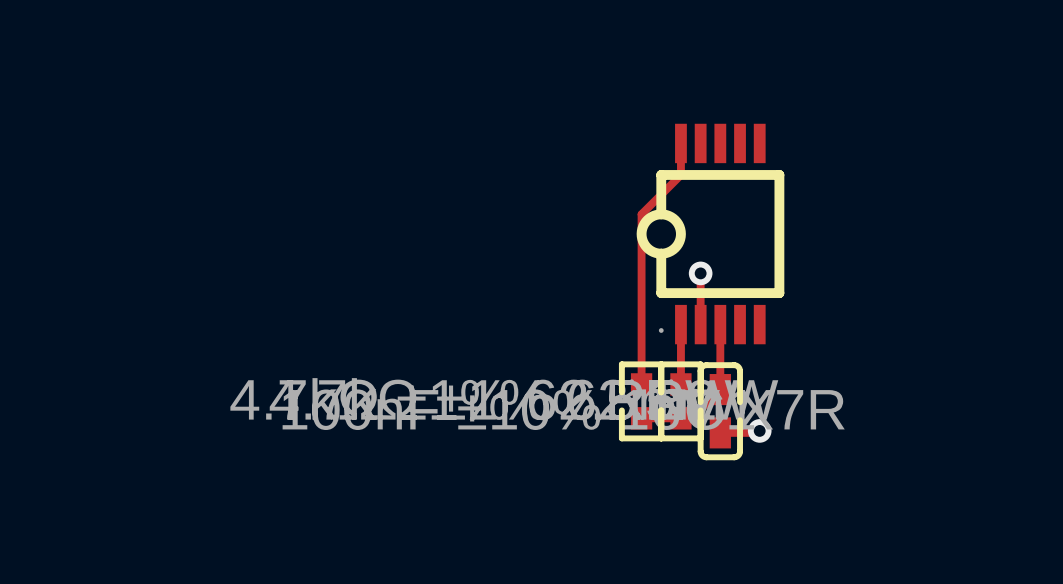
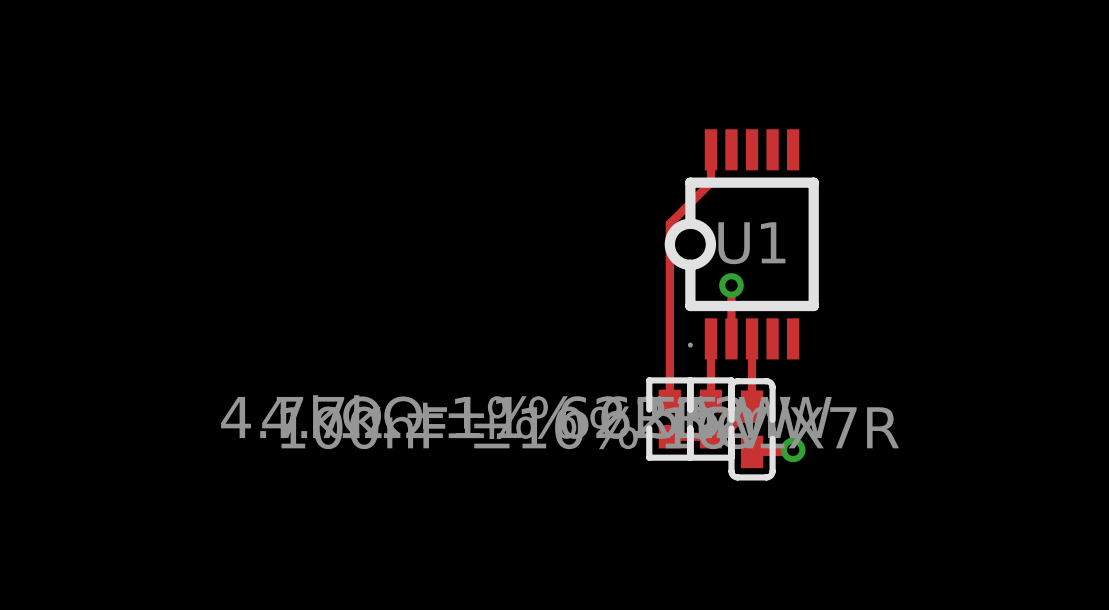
U1 name: none -> U1 (751, 243)

